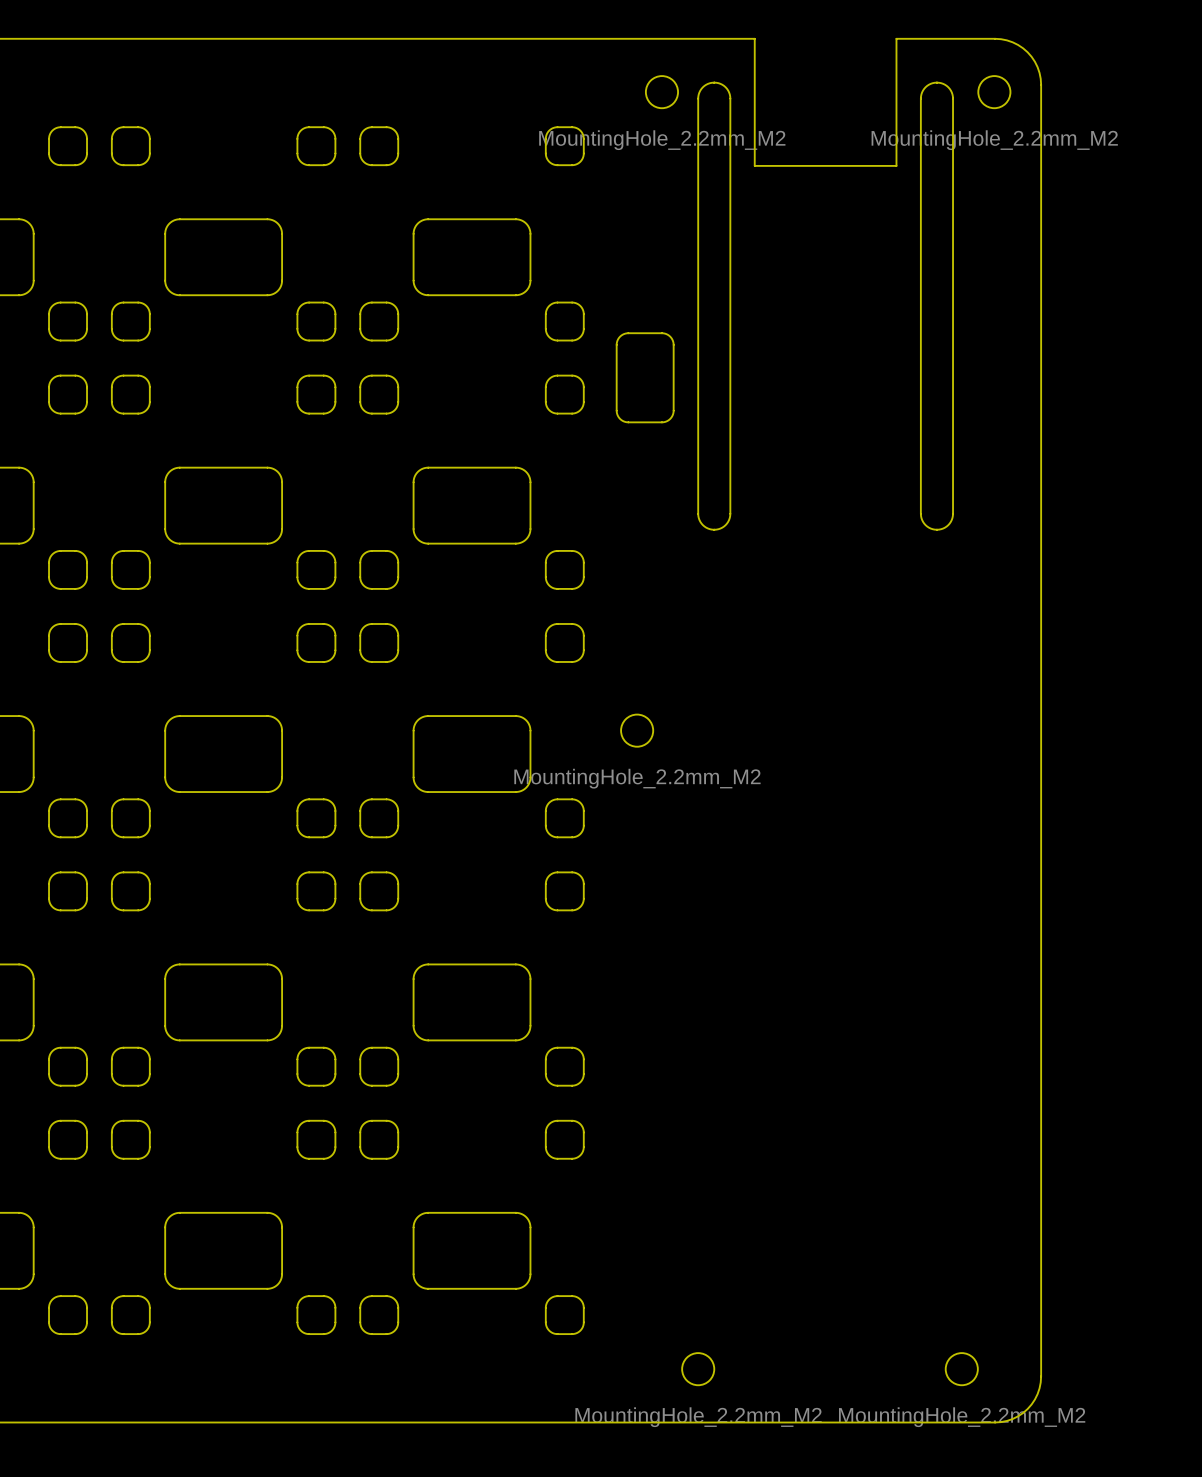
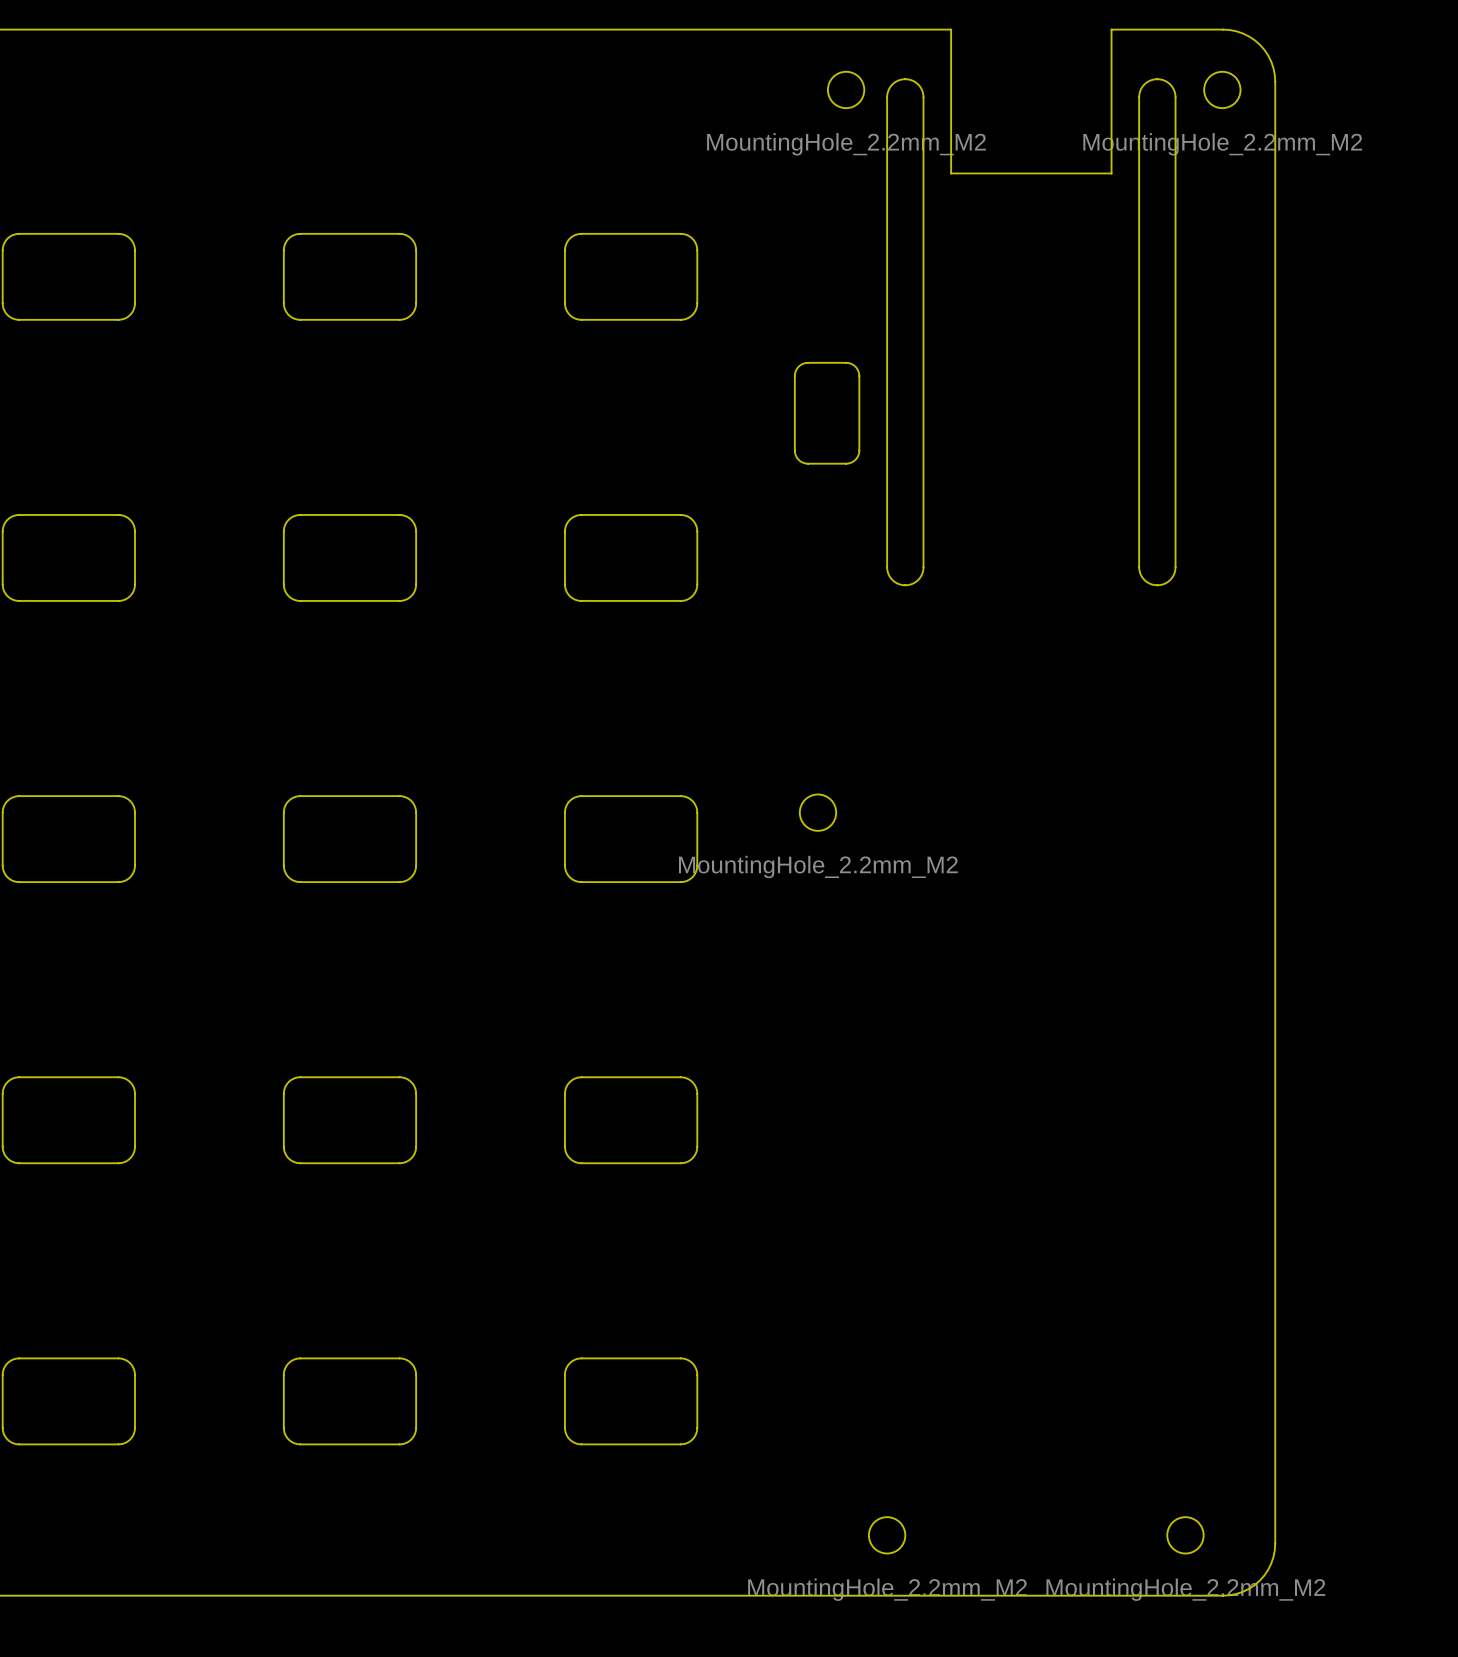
board edge: (60, 127) (78, 127) (85, 133) (86, 155) (81, 163) (59, 165) (50, 159) (49, 135) (53, 129) (60, 127) -> none
board edge: (123, 127) (141, 127) (148, 133) (149, 155) (144, 163) (122, 165) (113, 159) (112, 135) (116, 129) (123, 127) -> none
board edge: (309, 127) (326, 127) (333, 133) (335, 155) (329, 163) (307, 165) (298, 159) (297, 135) (301, 129) (309, 127) -> none
board edge: (371, 127) (389, 127) (396, 133) (398, 155) (392, 163) (370, 165) (361, 159) (360, 135) (364, 129) (371, 127) -> none
board edge: (557, 127) (575, 127) (582, 133) (583, 155) (577, 163) (555, 165) (547, 159) (546, 135) (550, 129) (557, 127) -> none
board edge: (60, 302) (78, 302) (85, 308) (86, 330) (81, 338) (59, 340) (50, 334) (49, 311) (53, 304) (60, 302) -> none
board edge: (123, 302) (141, 302) (148, 308) (149, 330) (144, 338) (122, 340) (113, 334) (112, 311) (116, 304) (123, 302) -> none
board edge: (309, 302) (326, 302) (333, 308) (335, 330) (329, 338) (307, 340) (298, 334) (297, 311) (301, 304) (309, 302) -> none
board edge: (371, 302) (389, 302) (396, 308) (398, 330) (392, 338) (370, 340) (361, 334) (360, 311) (364, 304) (371, 302) -> none
board edge: (557, 302) (575, 302) (582, 308) (583, 330) (577, 338) (555, 340) (547, 334) (546, 311) (550, 304) (557, 302) -> none
board edge: (60, 375) (78, 375) (85, 381) (86, 403) (81, 412) (59, 413) (50, 407) (49, 384) (53, 378) (60, 375) -> none
board edge: (123, 375) (141, 375) (148, 381) (149, 403) (144, 412) (122, 413) (113, 407) (112, 384) (116, 378) (123, 375) -> none
board edge: (309, 375) (326, 375) (333, 381) (335, 403) (329, 412) (307, 413) (298, 407) (297, 384) (301, 378) (309, 375) -> none
board edge: (371, 375) (389, 375) (396, 381) (398, 403) (392, 412) (370, 413) (361, 407) (360, 384) (364, 378) (371, 375) -> none
board edge: (557, 375) (575, 375) (582, 381) (583, 403) (577, 412) (555, 413) (547, 407) (546, 384) (550, 378) (557, 375) -> none
board edge: (60, 550) (78, 551) (85, 556) (86, 578) (81, 587) (59, 588) (50, 583) (49, 559) (53, 553) (60, 550) -> none
board edge: (123, 550) (141, 551) (148, 556) (149, 578) (144, 587) (122, 588) (113, 583) (112, 559) (116, 553) (123, 550) -> none
board edge: (309, 550) (326, 551) (333, 556) (335, 578) (329, 587) (307, 588) (299, 583) (297, 559) (301, 553) (309, 550) -> none
board edge: (371, 550) (389, 551) (396, 556) (398, 578) (392, 587) (370, 588) (362, 583) (360, 559) (364, 553) (371, 550) -> none
board edge: (557, 550) (575, 551) (582, 556) (583, 578) (577, 587) (556, 588) (547, 583) (546, 559) (550, 553) (557, 550) -> none
board edge: (60, 623) (78, 624) (85, 629) (86, 651) (81, 660) (59, 661) (50, 656) (49, 632) (53, 626) (60, 623) -> none
board edge: (123, 623) (141, 624) (148, 629) (149, 651) (144, 660) (122, 661) (113, 656) (112, 632) (116, 626) (123, 623) -> none
board edge: (309, 623) (326, 624) (333, 629) (335, 651) (329, 660) (307, 661) (299, 656) (297, 632) (301, 626) (309, 623) -> none
board edge: (371, 623) (389, 624) (396, 629) (398, 651) (392, 660) (370, 661) (362, 656) (360, 632) (364, 626) (371, 623) -> none
board edge: (557, 623) (575, 624) (582, 629) (583, 651) (577, 660) (556, 661) (547, 656) (546, 632) (550, 626) (557, 623) -> none
board edge: (60, 799) (78, 799) (85, 805) (86, 827) (81, 835) (59, 837) (50, 831) (49, 807) (53, 801) (60, 799) -> none
board edge: (123, 799) (141, 799) (148, 805) (149, 827) (144, 835) (122, 837) (113, 831) (112, 807) (116, 801) (123, 799) -> none
board edge: (309, 799) (326, 799) (333, 805) (335, 827) (329, 835) (307, 837) (299, 831) (297, 807) (301, 801) (309, 799) -> none
board edge: (371, 799) (389, 799) (396, 805) (398, 827) (392, 835) (370, 837) (362, 831) (360, 807) (364, 801) (371, 799) -> none
board edge: (557, 799) (575, 799) (582, 805) (583, 827) (577, 835) (556, 837) (547, 831) (546, 807) (550, 801) (557, 799) -> none
board edge: (60, 872) (78, 872) (85, 878) (86, 900) (81, 908) (59, 910) (50, 904) (49, 881) (53, 874) (60, 872) -> none
board edge: (123, 872) (141, 872) (148, 878) (149, 900) (144, 908) (122, 910) (113, 904) (112, 881) (116, 874) (123, 872) -> none
board edge: (309, 872) (326, 872) (333, 878) (335, 900) (329, 908) (307, 910) (299, 904) (297, 881) (301, 874) (309, 872) -> none
board edge: (371, 872) (389, 872) (396, 878) (398, 900) (392, 908) (370, 910) (362, 904) (360, 881) (364, 874) (371, 872) -> none
board edge: (557, 872) (575, 872) (582, 878) (583, 900) (577, 908) (556, 910) (547, 904) (546, 881) (550, 874) (557, 872) -> none
board edge: (60, 1047) (78, 1048) (85, 1053) (86, 1075) (81, 1084) (59, 1085) (50, 1079) (49, 1056) (53, 1050) (60, 1047) -> none
board edge: (123, 1047) (141, 1048) (148, 1053) (149, 1075) (144, 1084) (122, 1085) (113, 1079) (112, 1056) (116, 1050) (123, 1047) -> none
board edge: (309, 1047) (326, 1048) (333, 1053) (335, 1075) (329, 1084) (307, 1085) (298, 1079) (297, 1056) (301, 1050) (309, 1047) -> none
board edge: (371, 1047) (389, 1048) (396, 1053) (398, 1075) (392, 1084) (370, 1085) (361, 1079) (360, 1056) (364, 1050) (371, 1047) -> none
board edge: (557, 1047) (575, 1048) (582, 1053) (583, 1075) (577, 1084) (555, 1085) (547, 1079) (546, 1056) (550, 1050) (557, 1047) -> none
board edge: (60, 1120) (78, 1121) (85, 1126) (86, 1148) (81, 1157) (59, 1158) (50, 1152) (49, 1129) (53, 1123) (60, 1120) -> none
board edge: (123, 1120) (141, 1121) (148, 1126) (149, 1148) (144, 1157) (122, 1158) (113, 1152) (112, 1129) (116, 1123) (123, 1120) -> none
board edge: (309, 1120) (326, 1121) (333, 1126) (335, 1148) (329, 1157) (307, 1158) (298, 1152) (297, 1129) (301, 1123) (309, 1120) -> none
board edge: (371, 1120) (389, 1121) (396, 1126) (398, 1148) (392, 1157) (370, 1158) (361, 1152) (360, 1129) (364, 1123) (371, 1120) -> none
board edge: (557, 1120) (575, 1121) (582, 1126) (583, 1148) (577, 1157) (555, 1158) (547, 1152) (546, 1129) (550, 1123) (557, 1120) -> none
board edge: (60, 1296) (78, 1296) (85, 1301) (86, 1323) (81, 1332) (59, 1334) (50, 1328) (49, 1304) (53, 1298) (60, 1296) -> none
board edge: (123, 1296) (141, 1296) (148, 1301) (149, 1323) (144, 1332) (122, 1334) (113, 1328) (112, 1304) (116, 1298) (123, 1296) -> none
board edge: (309, 1296) (326, 1296) (333, 1301) (335, 1323) (329, 1332) (307, 1334) (298, 1328) (297, 1304) (301, 1298) (309, 1296) -> none
board edge: (371, 1296) (389, 1296) (396, 1301) (398, 1323) (392, 1332) (370, 1334) (361, 1328) (360, 1304) (364, 1298) (371, 1296) -> none
board edge: (557, 1296) (575, 1296) (582, 1301) (583, 1323) (577, 1332) (555, 1334) (547, 1328) (546, 1304) (550, 1298) (557, 1296) -> none

